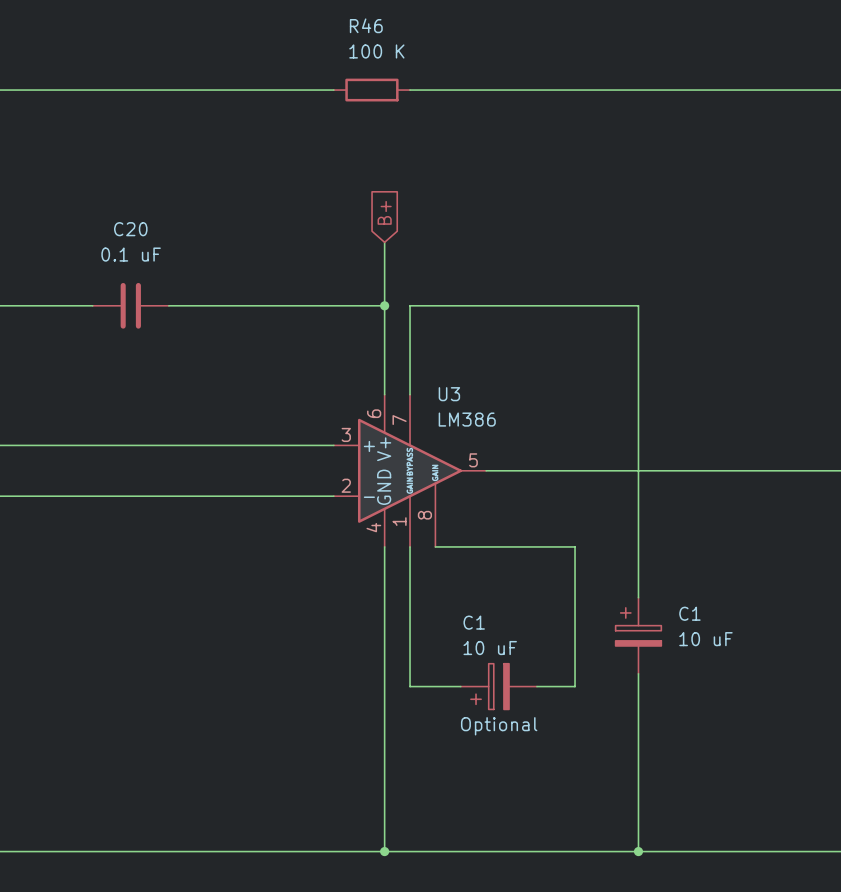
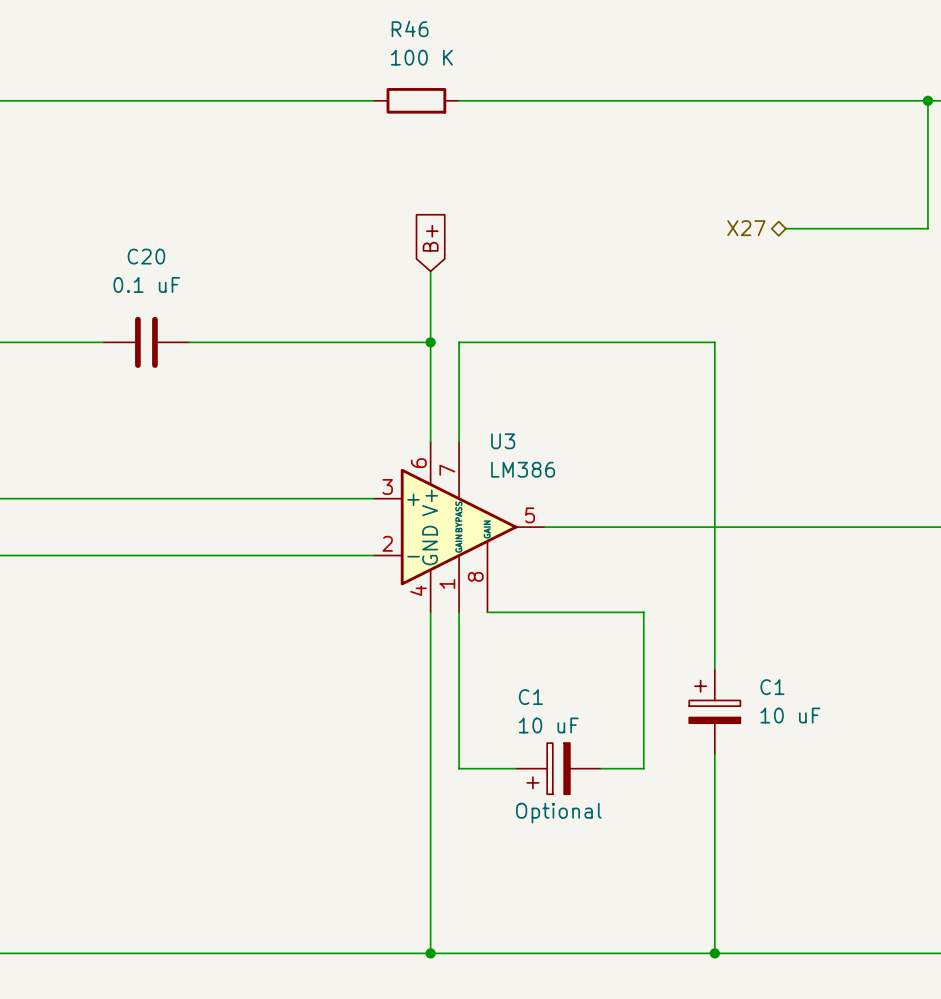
wire: none -> (927, 100) (927, 228) (785, 228)
junction: none -> (927, 100)
hierarchical label: none -> X27 (746, 228)

